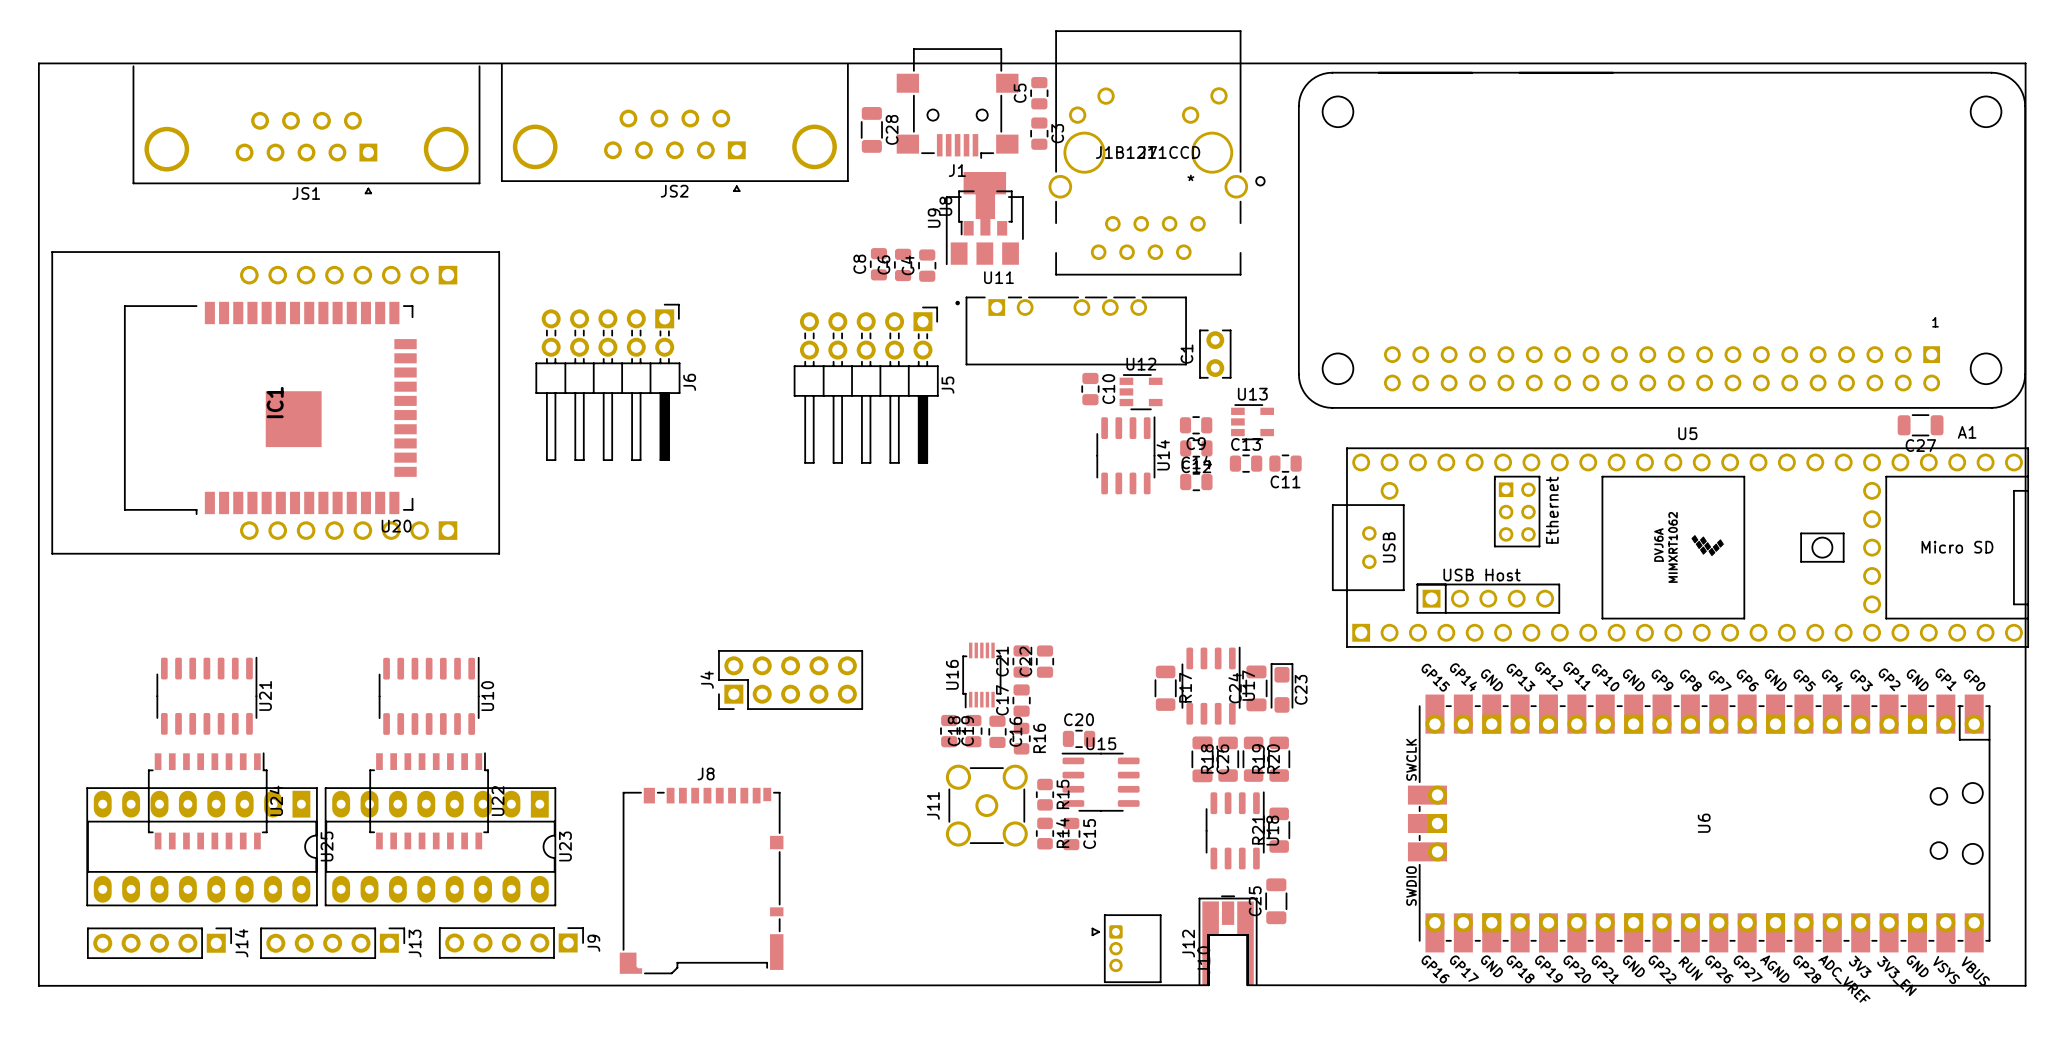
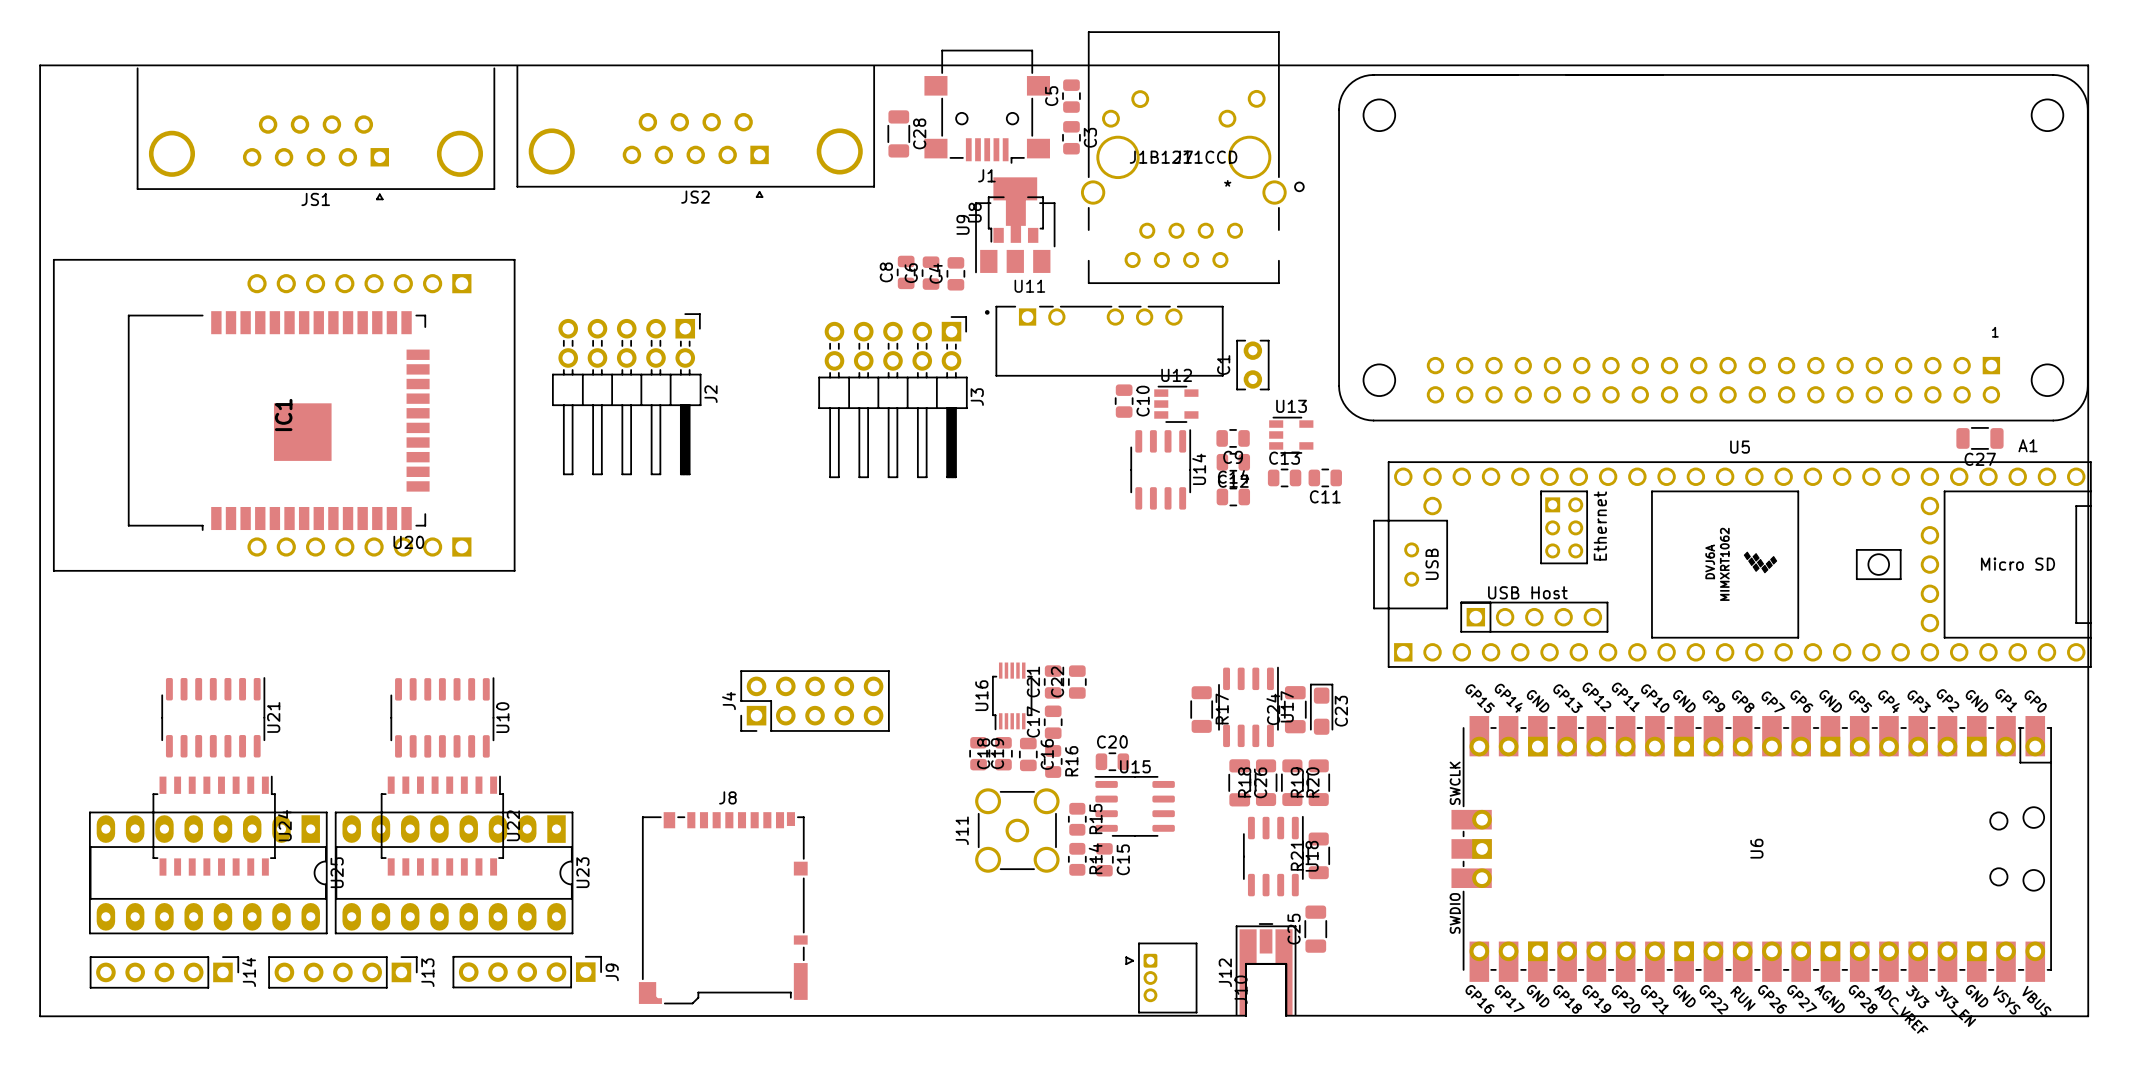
J6 name: J6 (689, 382) -> J2 (710, 394)
J5 name: J5 (947, 385) -> J3 (977, 397)

